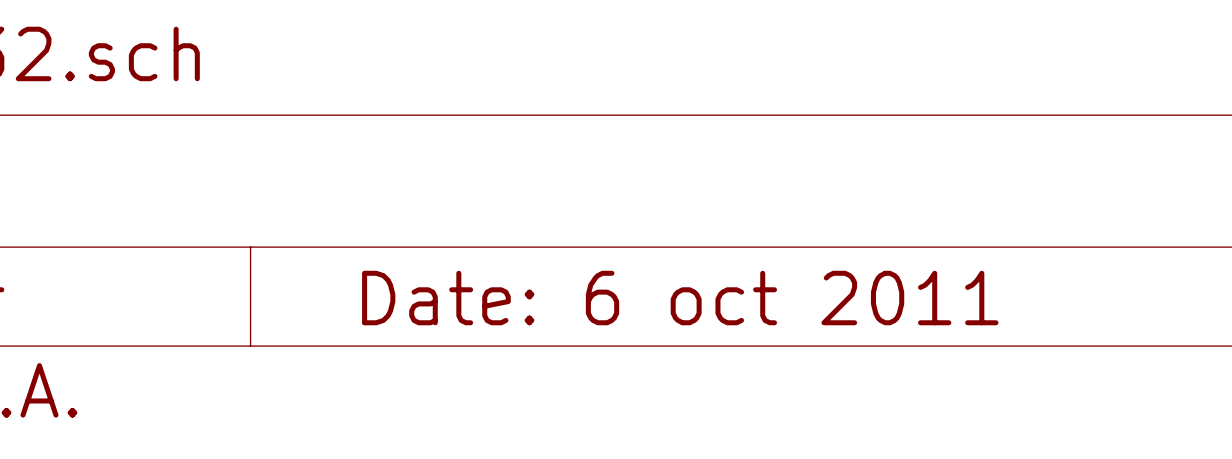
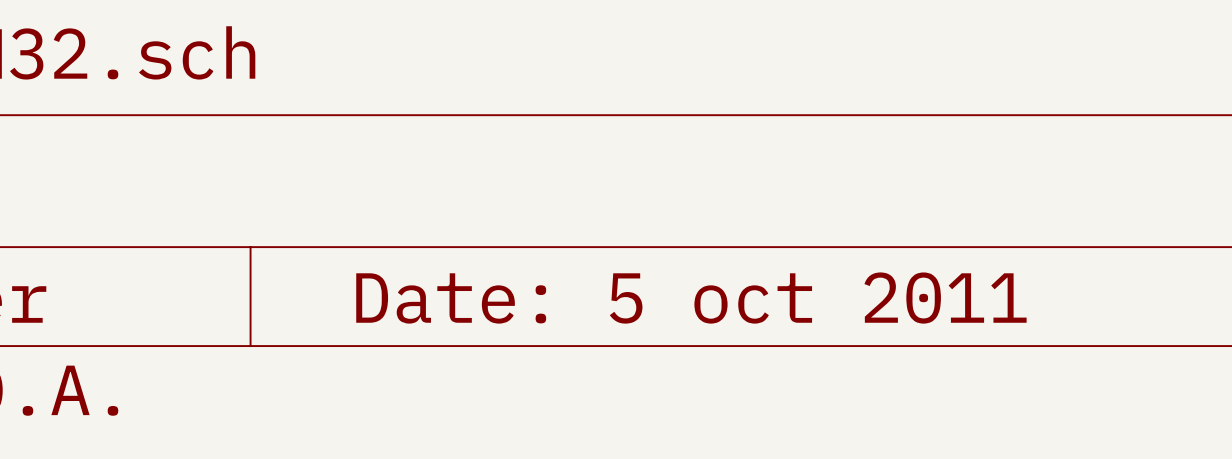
title block: Date: 6 oct 2011 (680, 298) -> Date: 5 oct 2011 (691, 298)

